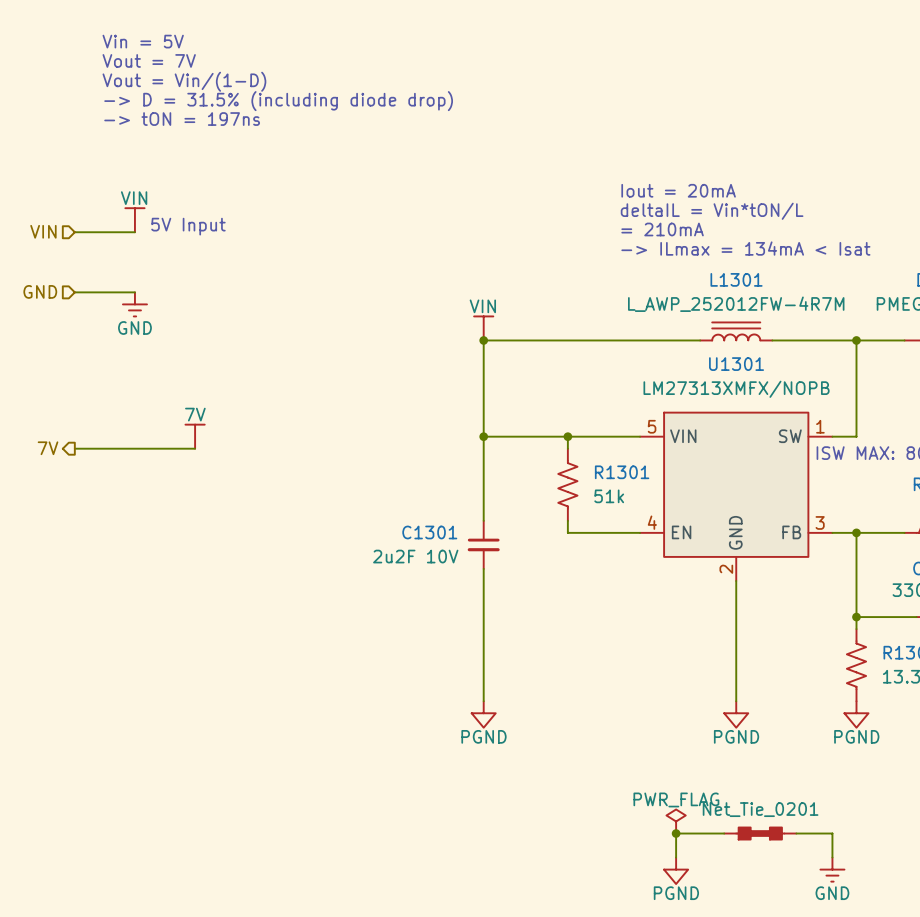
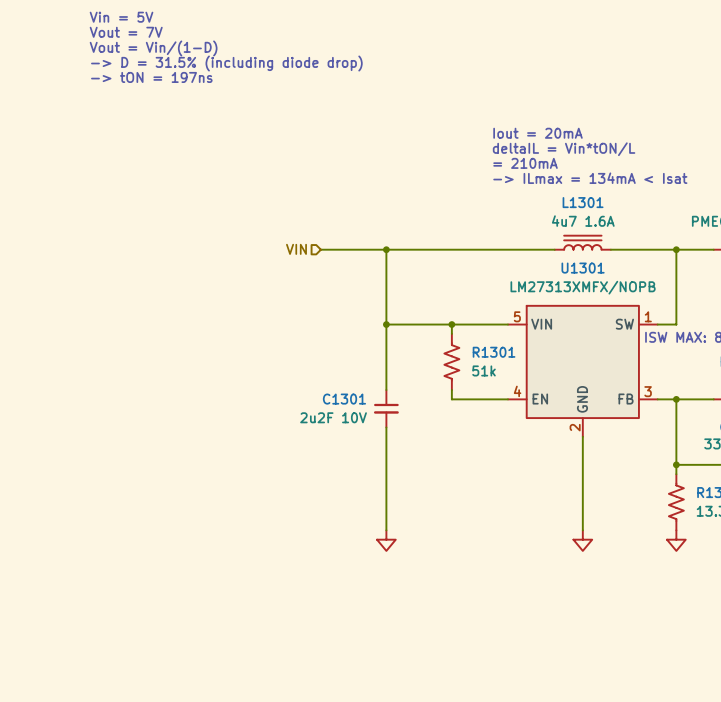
power symbol: VIN (134, 220) -> none
text: 5V Input (188, 226) -> none
hierarchical label: VIN (43, 231) -> none
wire: (74, 232) (134, 232) -> none
hierarchical label: GND (40, 291) -> none
wire: (74, 292) (134, 292) -> none
power symbol: GND (134, 304) -> none
L1301 value: L_AWP_252012FW-4R7M (736, 304) -> 4u7 1.6A (583, 221)
power symbol: VIN (483, 328) -> none
hierarchical label: none -> VIN (296, 249)
wire: none -> (320, 249) (386, 249)
power symbol: 7V (195, 436) -> none
hierarchical label: 7V (48, 448) -> none
wire: (74, 448) (195, 448) -> none
power symbol text: PGND (483, 736) -> none
power symbol text: PGND (736, 736) -> none
power symbol text: PGND (856, 736) -> none
power symbol: PWR_FLAG (676, 821) -> none
junction: (676, 833) -> none
wire: (724, 833) (676, 833) (676, 857) -> none
part: Net_Tie_0201 (760, 833) -> none
wire: (796, 833) (832, 833) (832, 857) -> none
power symbol: GND (832, 869) -> none
power symbol: PGND (676, 870) -> none

